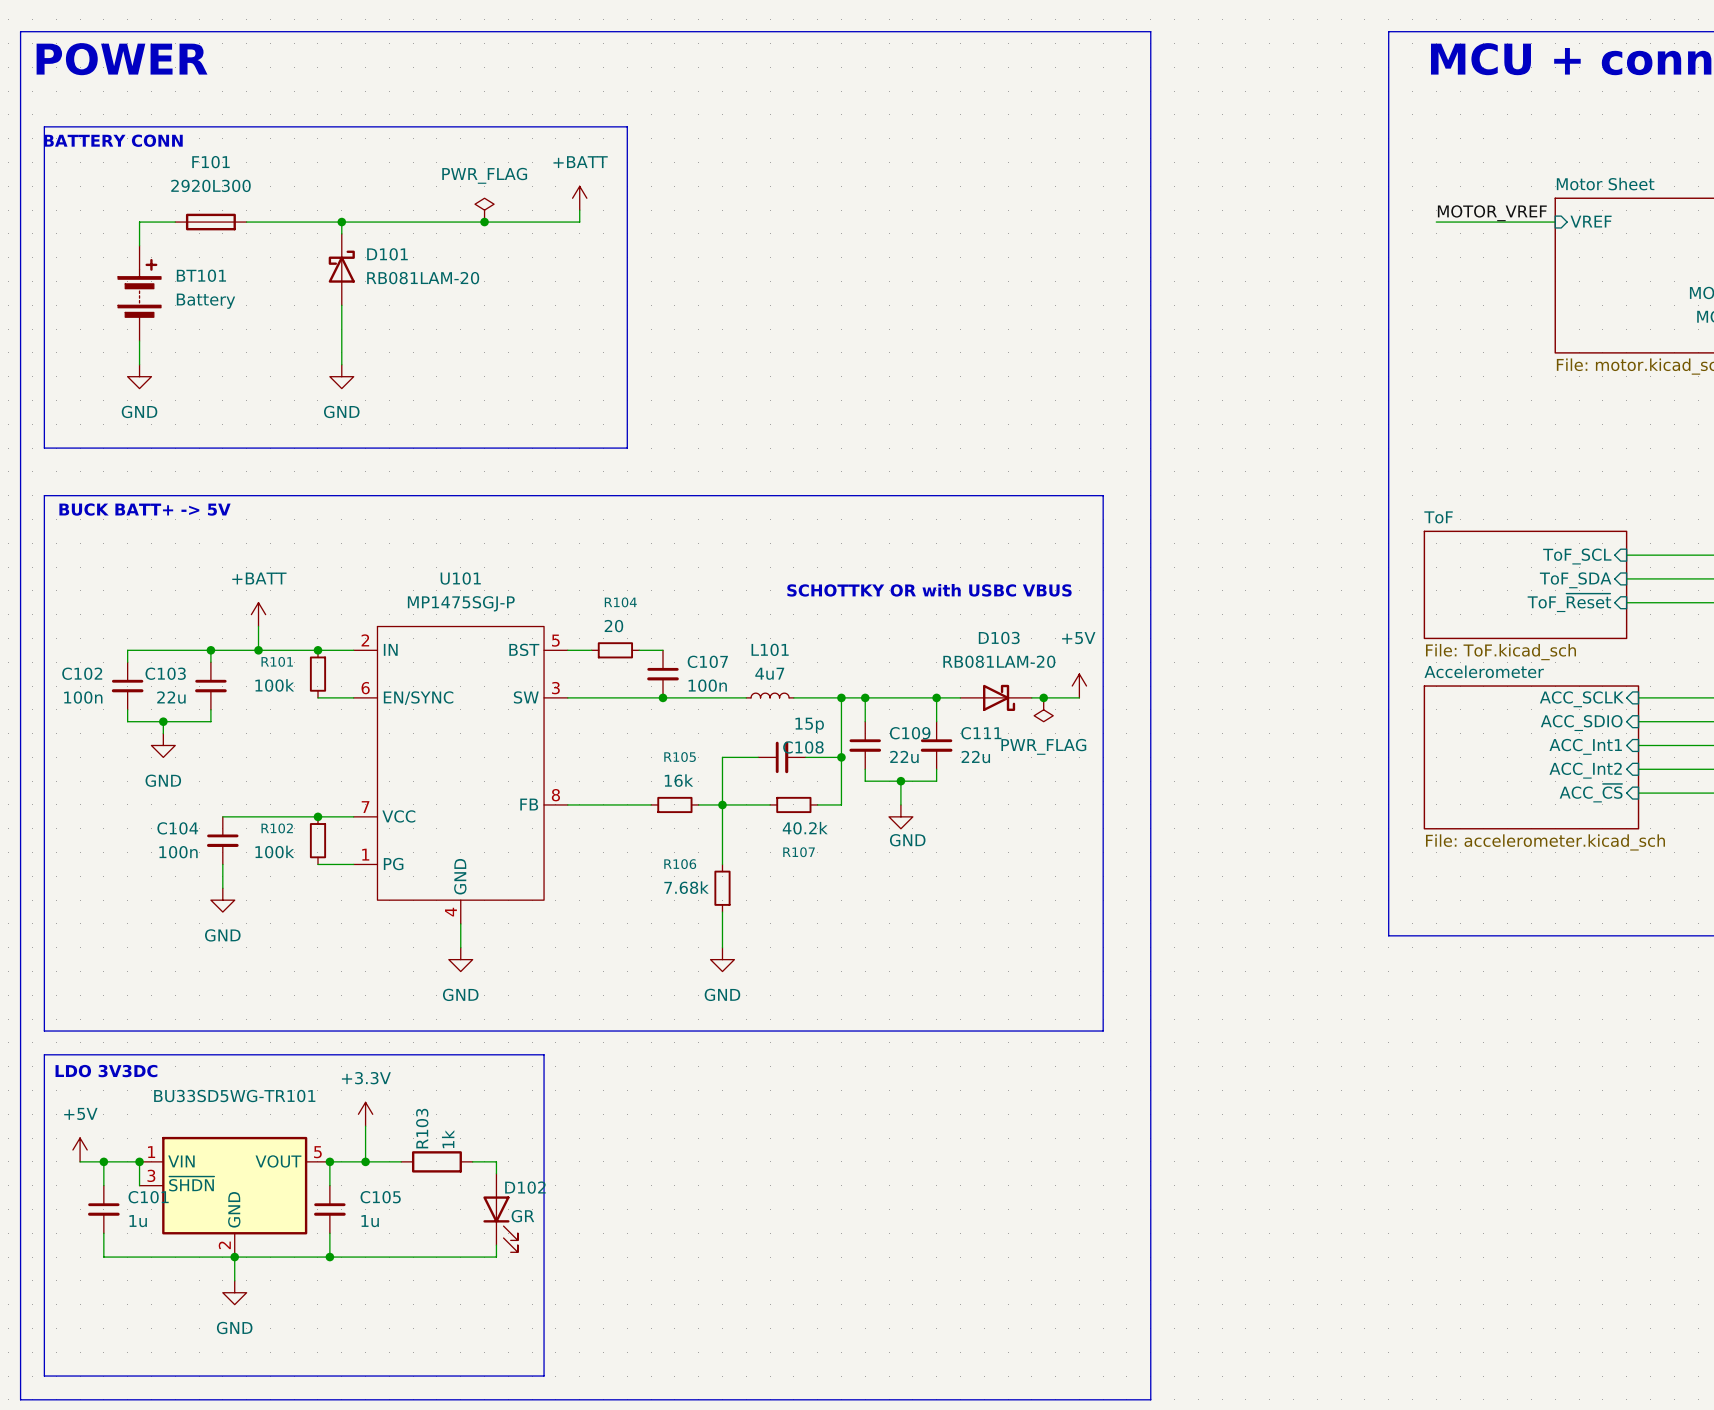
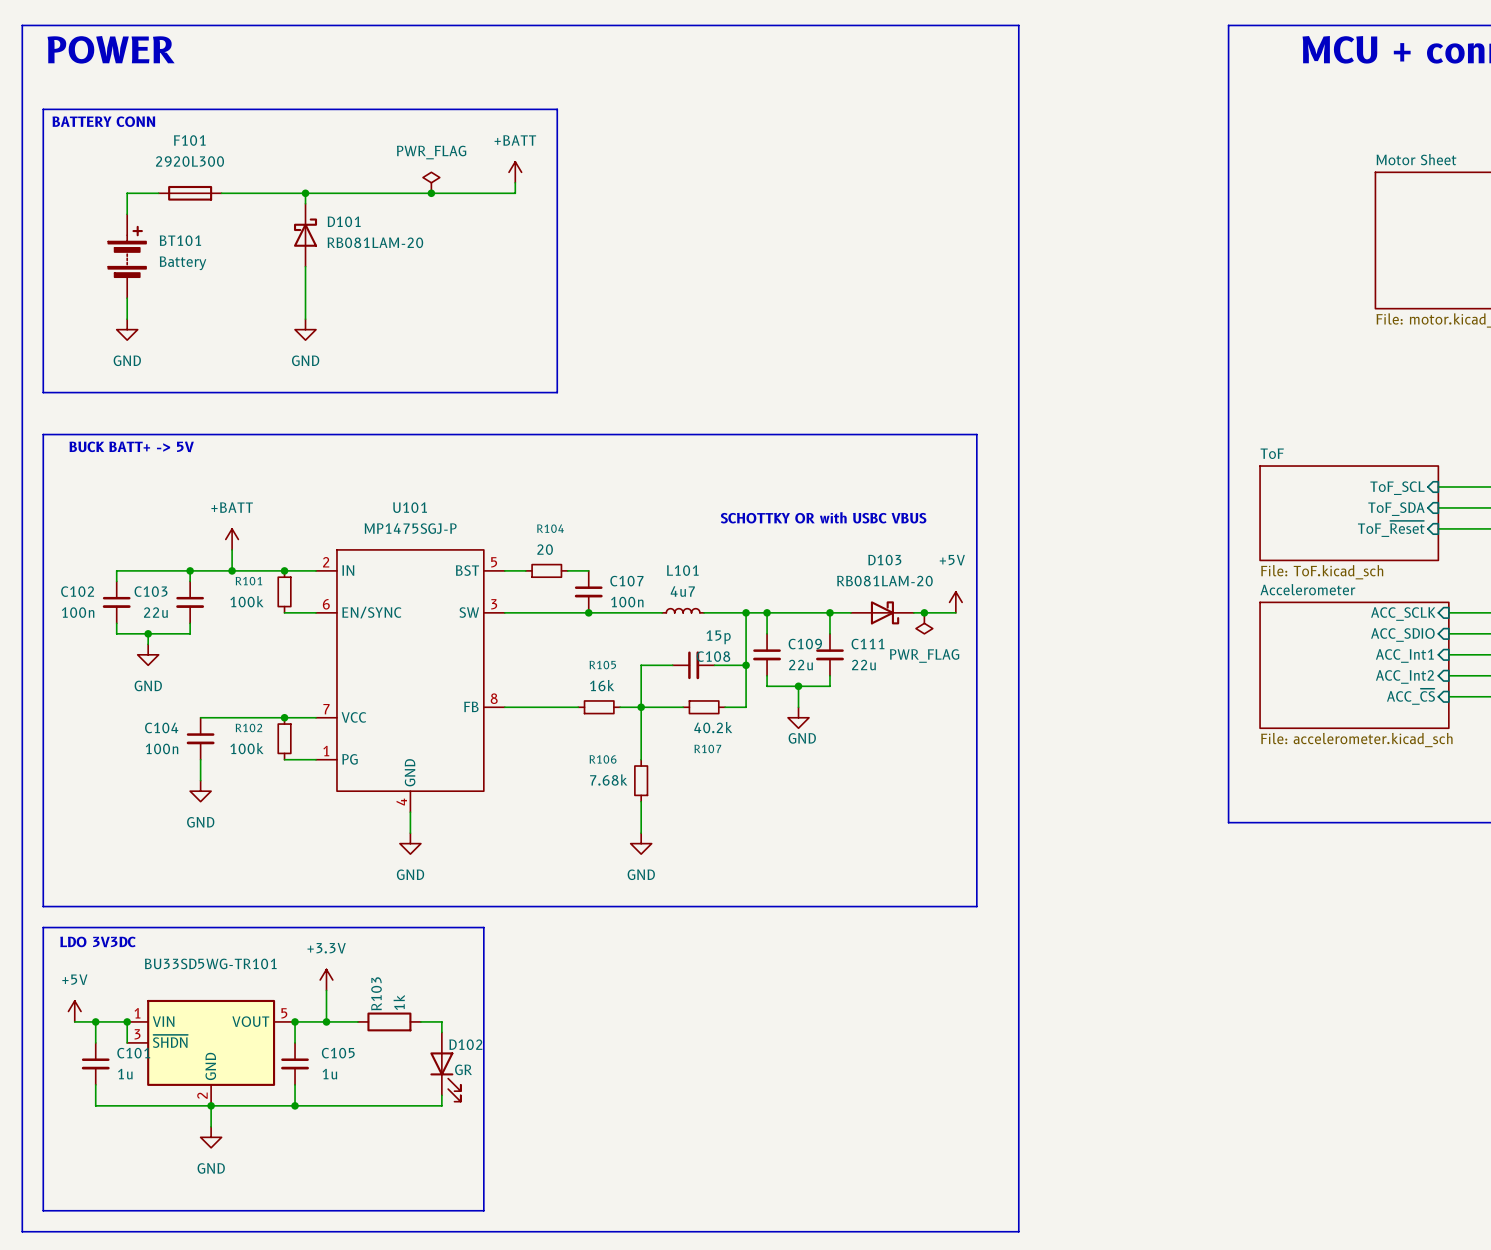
label: MOTOR_VREF (1492, 213) -> none
sheet pin: VREF (1591, 221) -> none
wire: (1436, 222) (1555, 222) -> none

